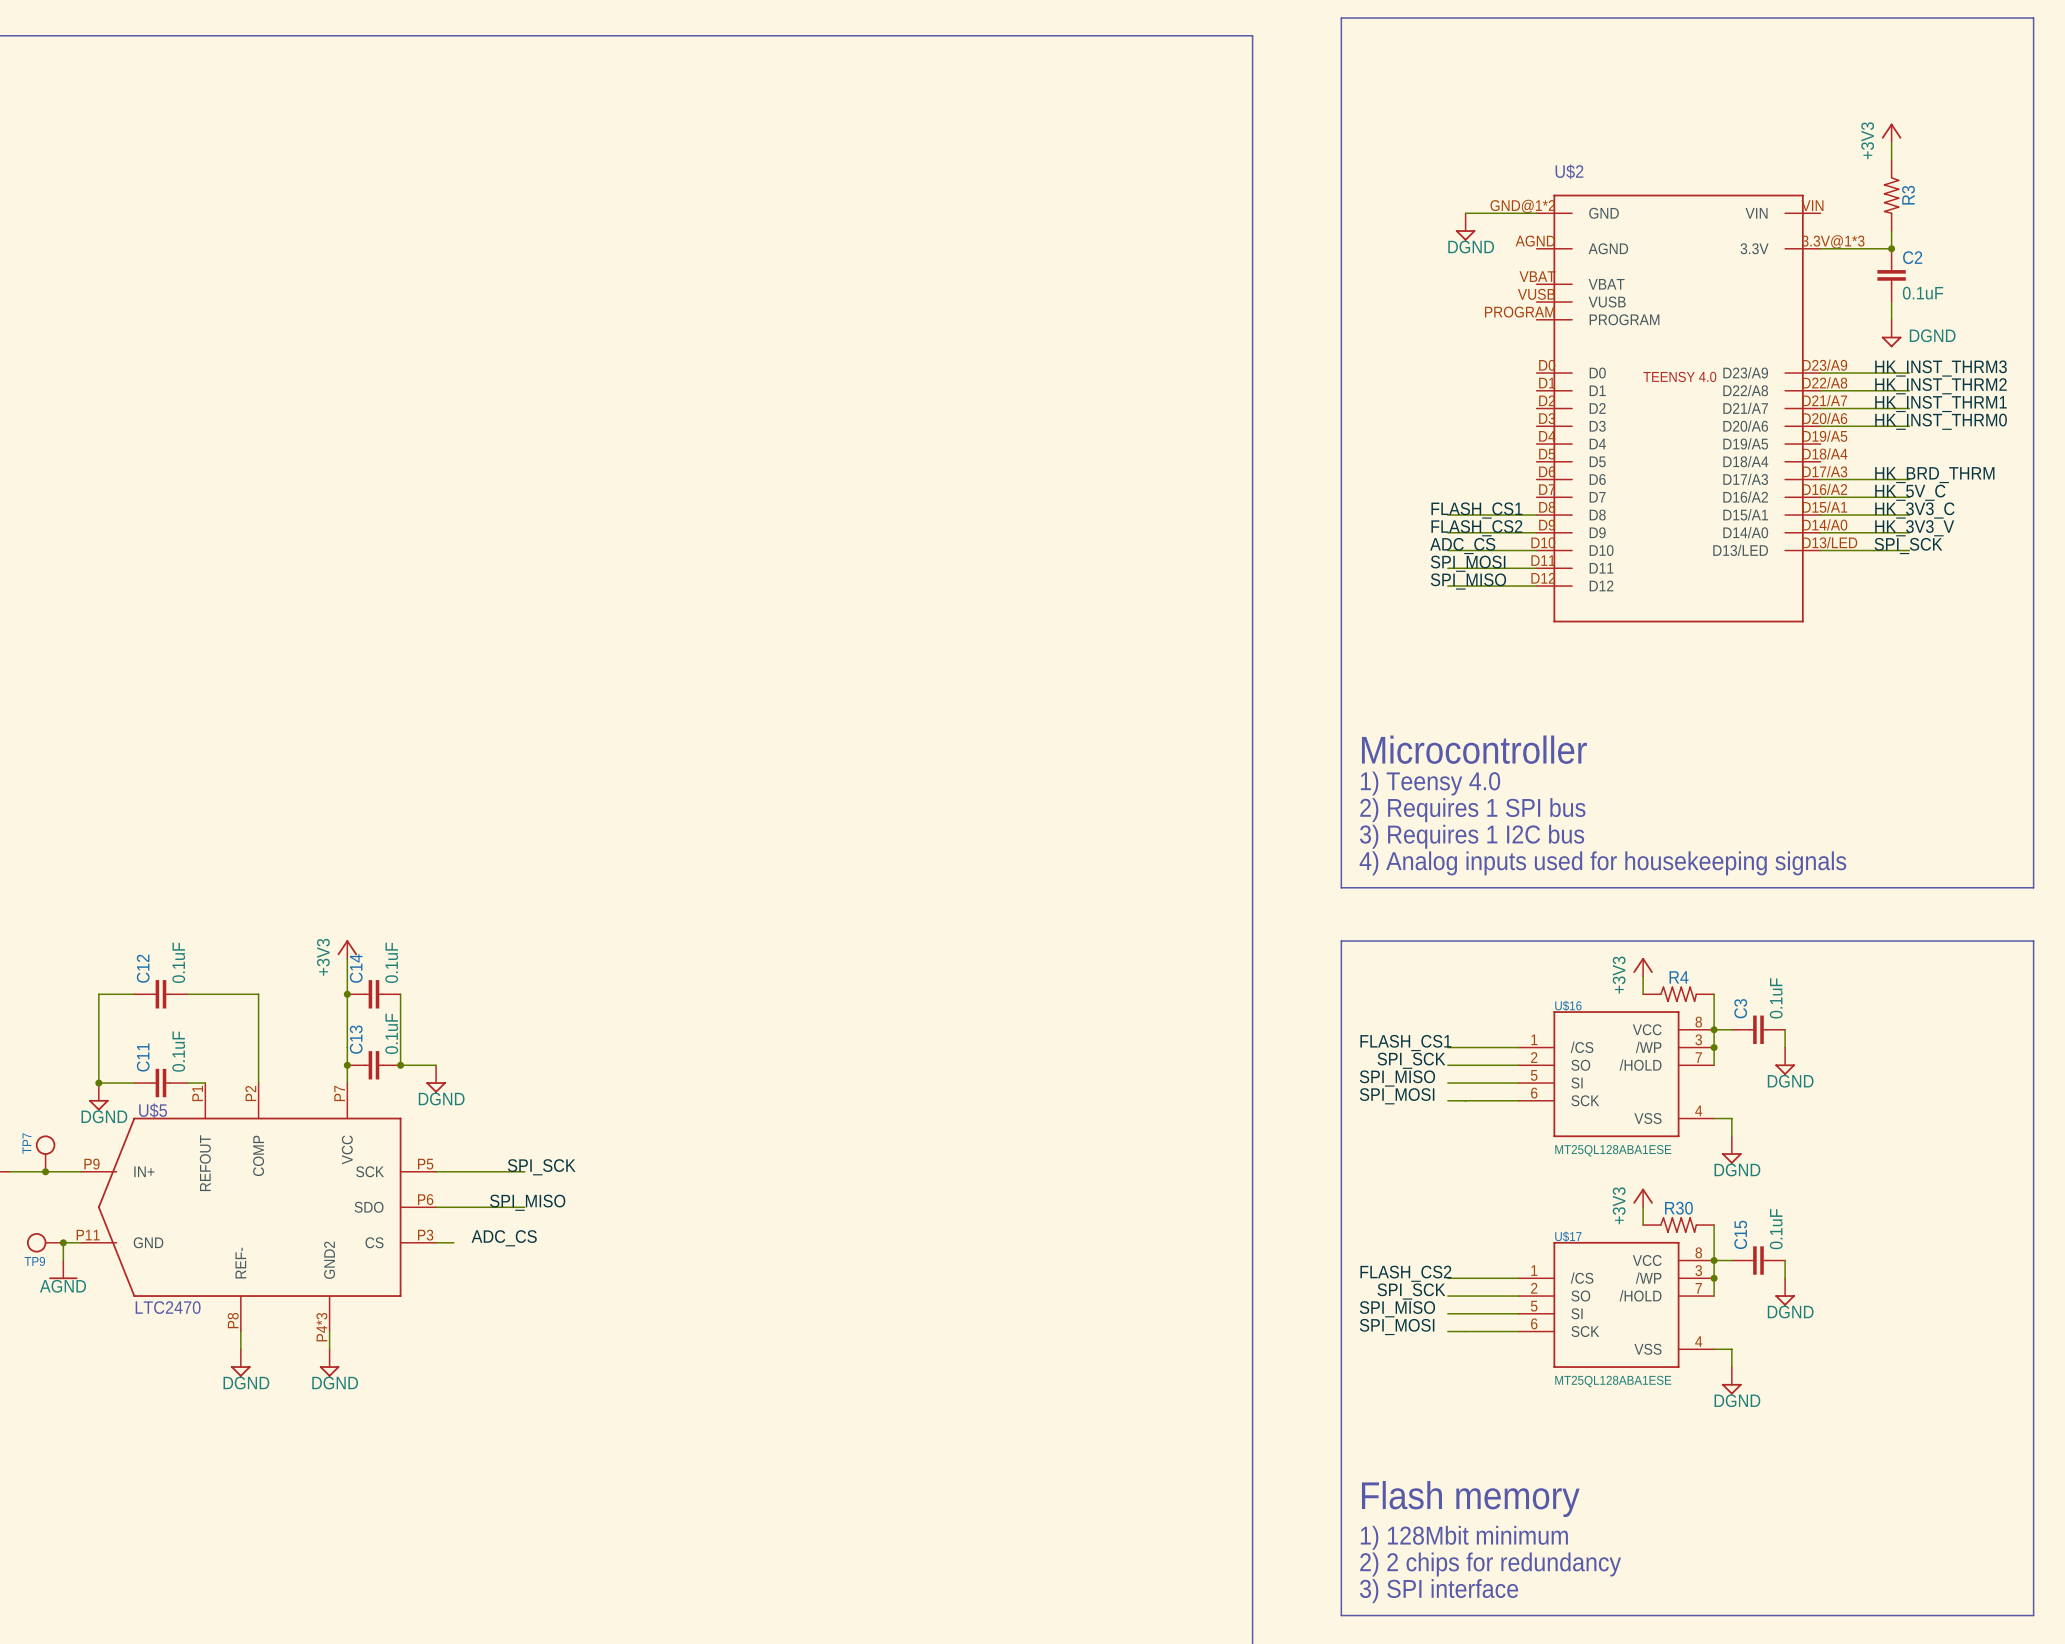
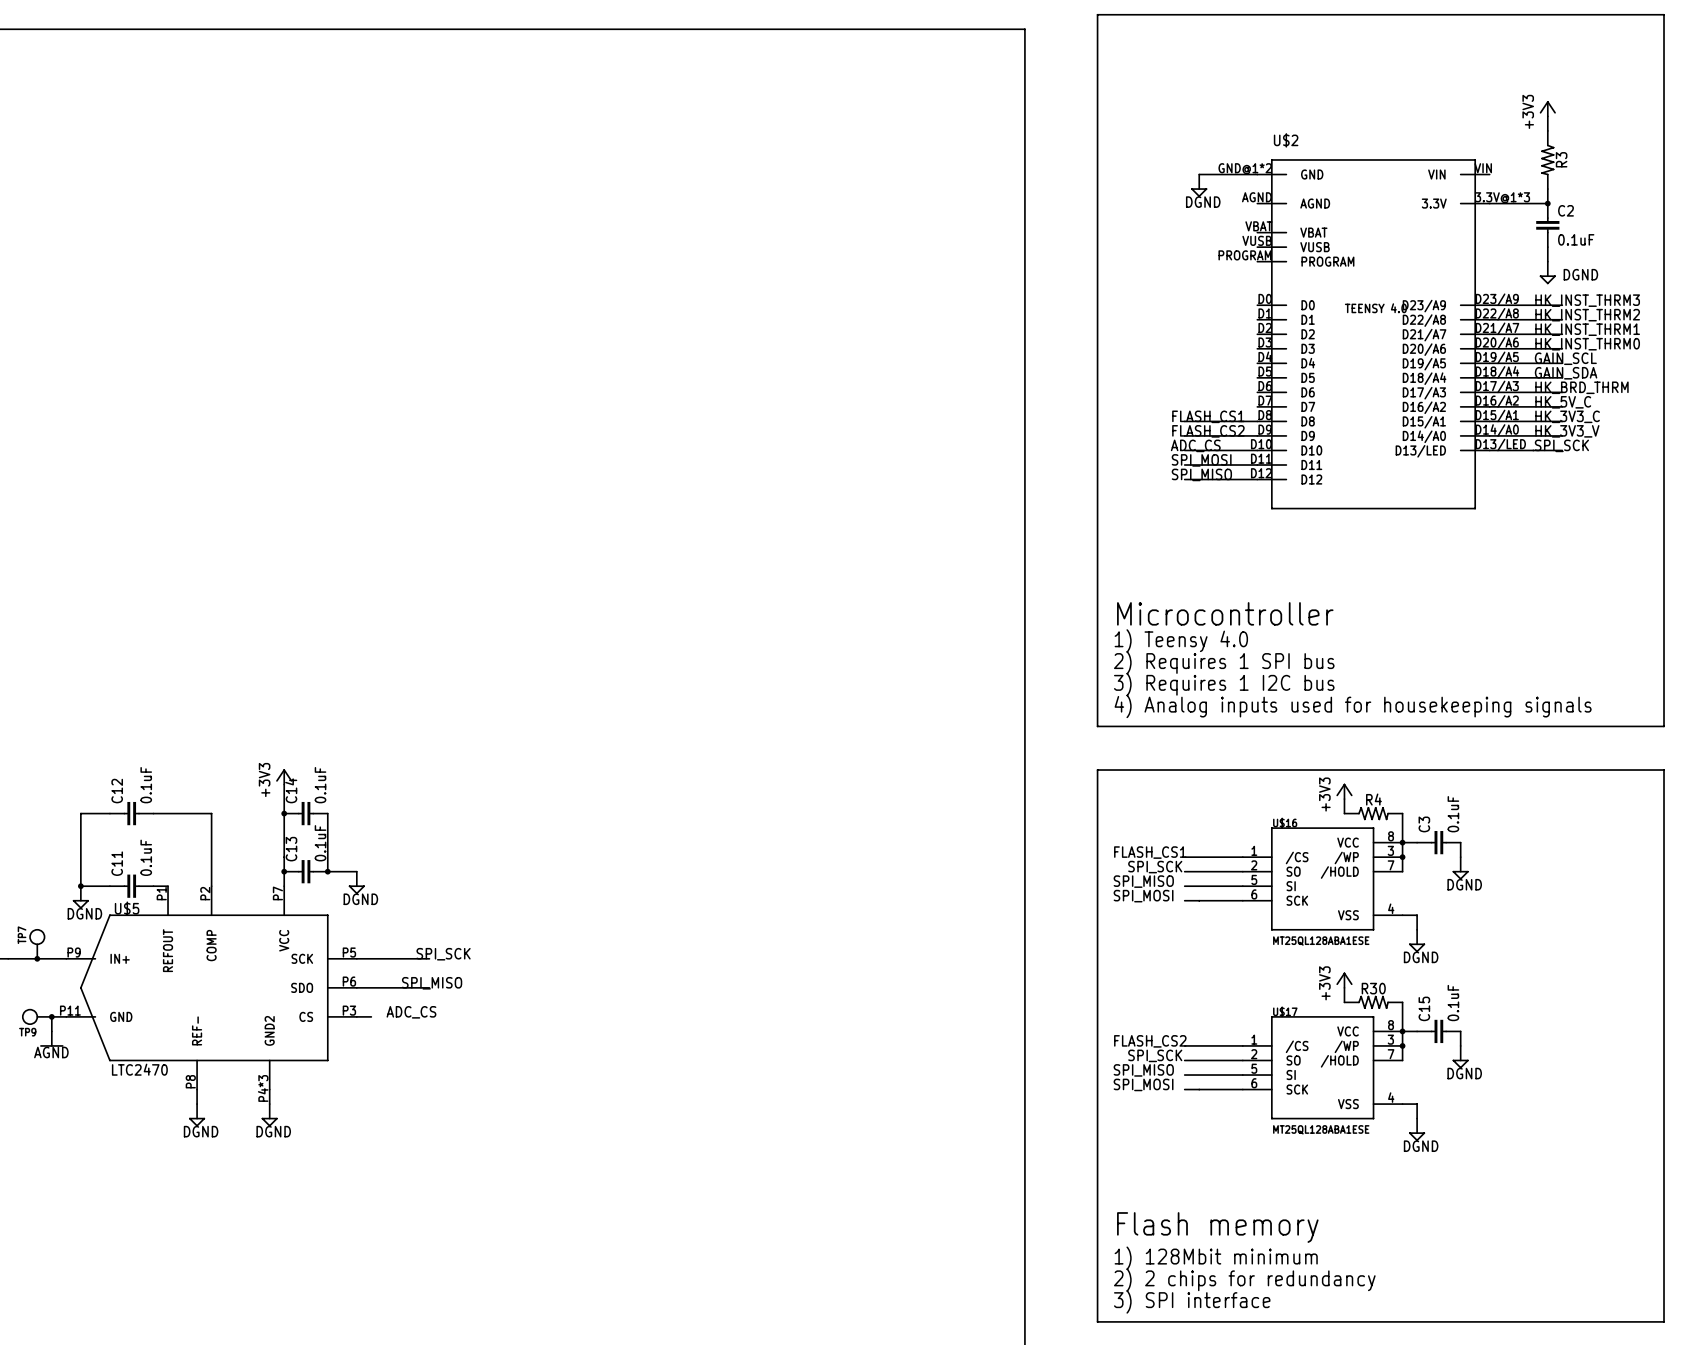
label: none -> GAIN_SCL (1565, 358)
wire: none -> (1489, 363) (1562, 363)
label: none -> GAIN_SDA (1566, 373)
wire: none -> (1489, 377) (1562, 377)

